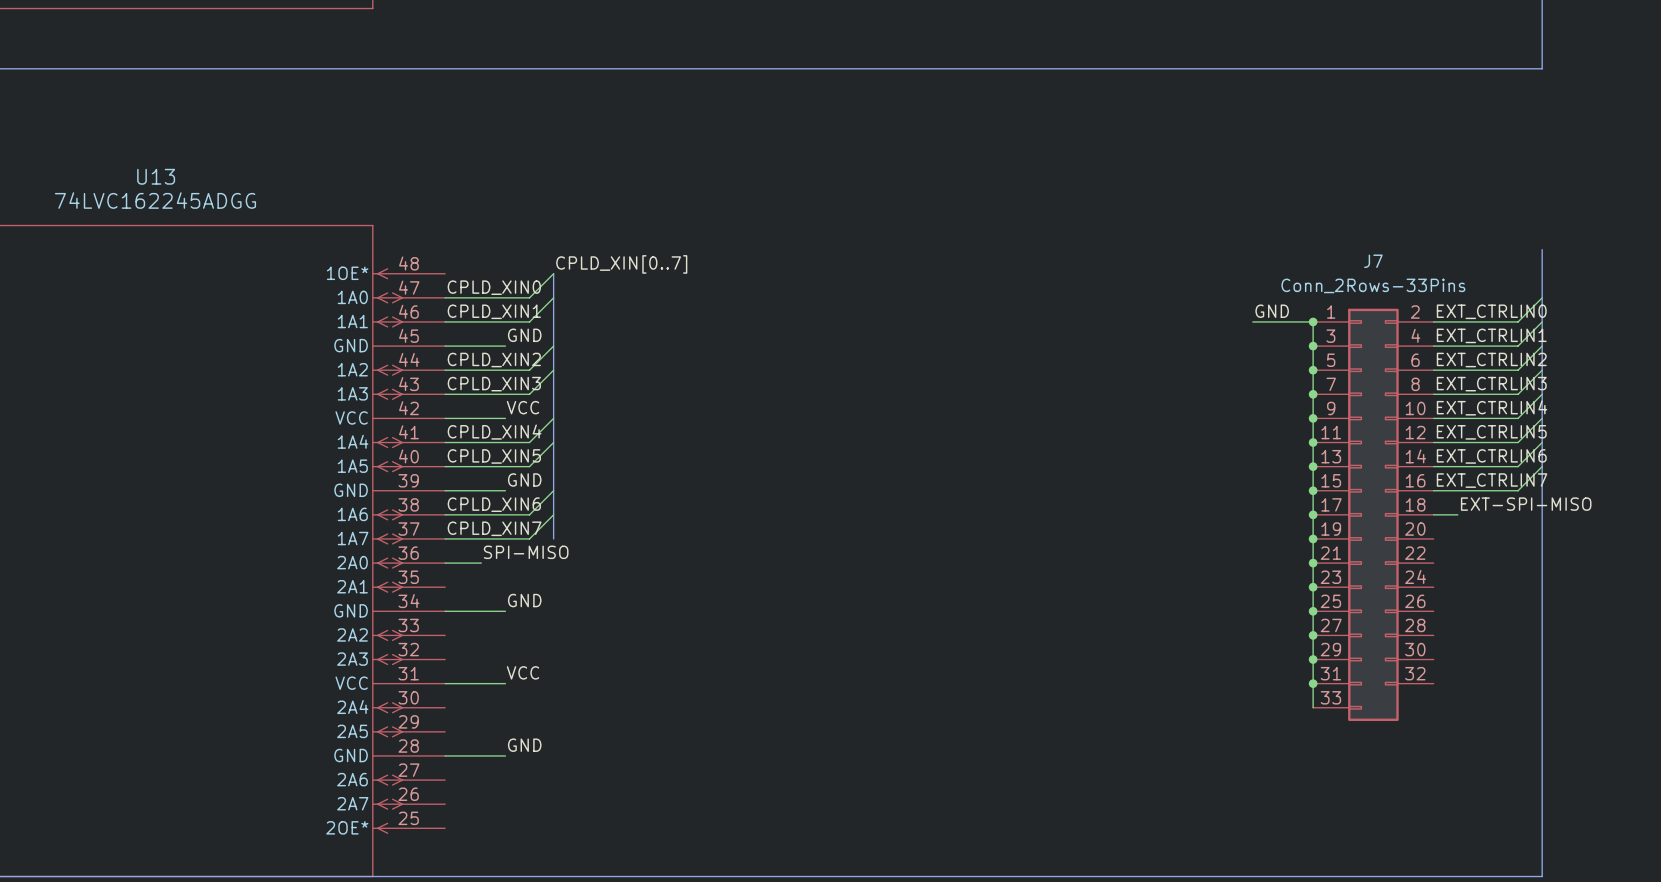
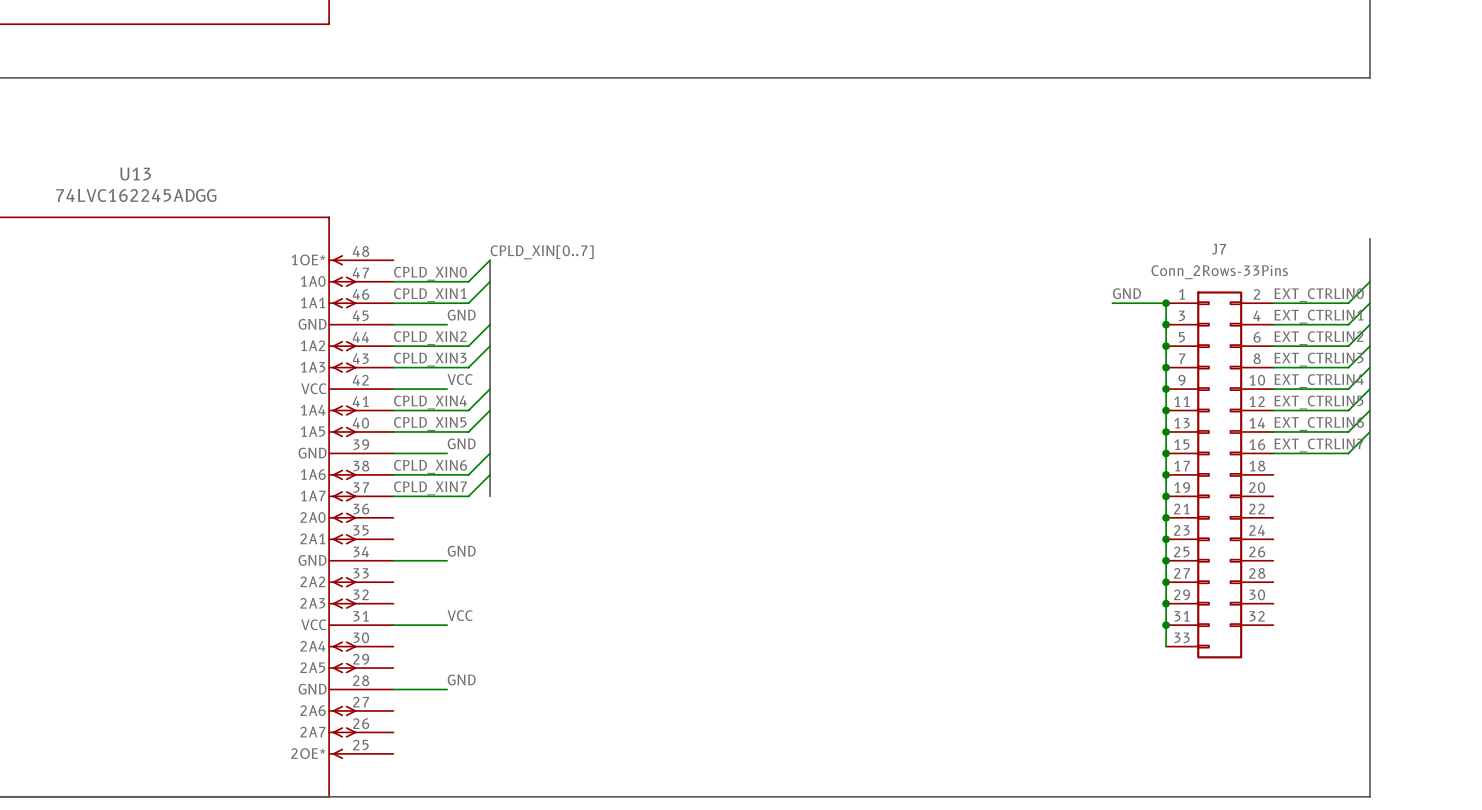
label: EXT-SPI-MISO (1526, 504) -> none
wire: (1433, 514) (1457, 514) -> none
label: SPI-MISO (526, 552) -> none
wire: (445, 563) (481, 563) -> none

